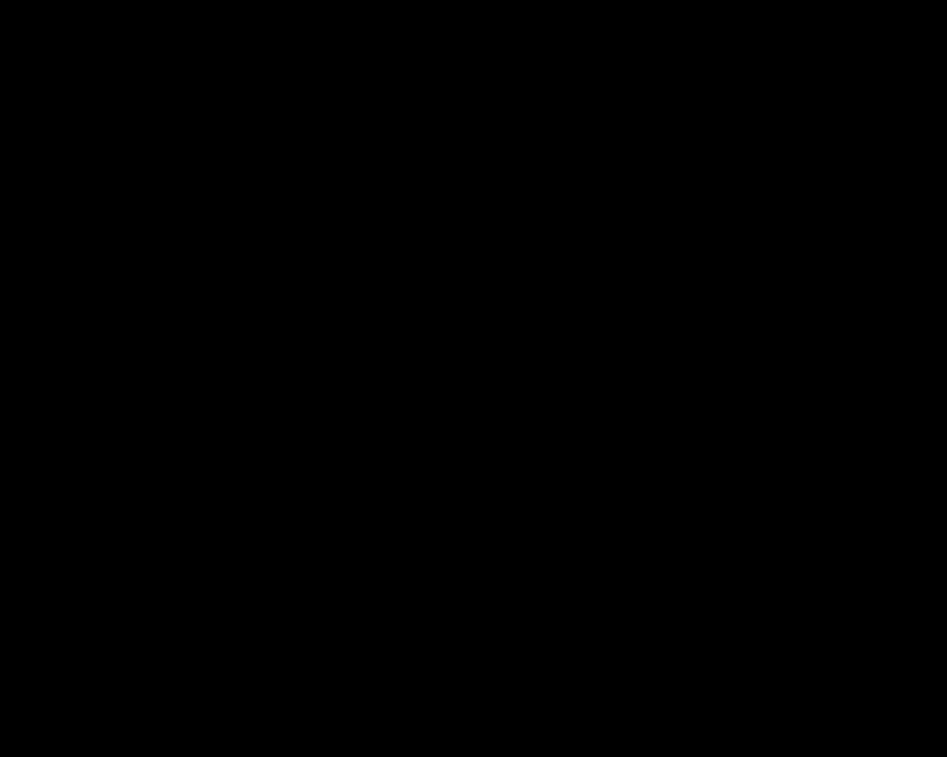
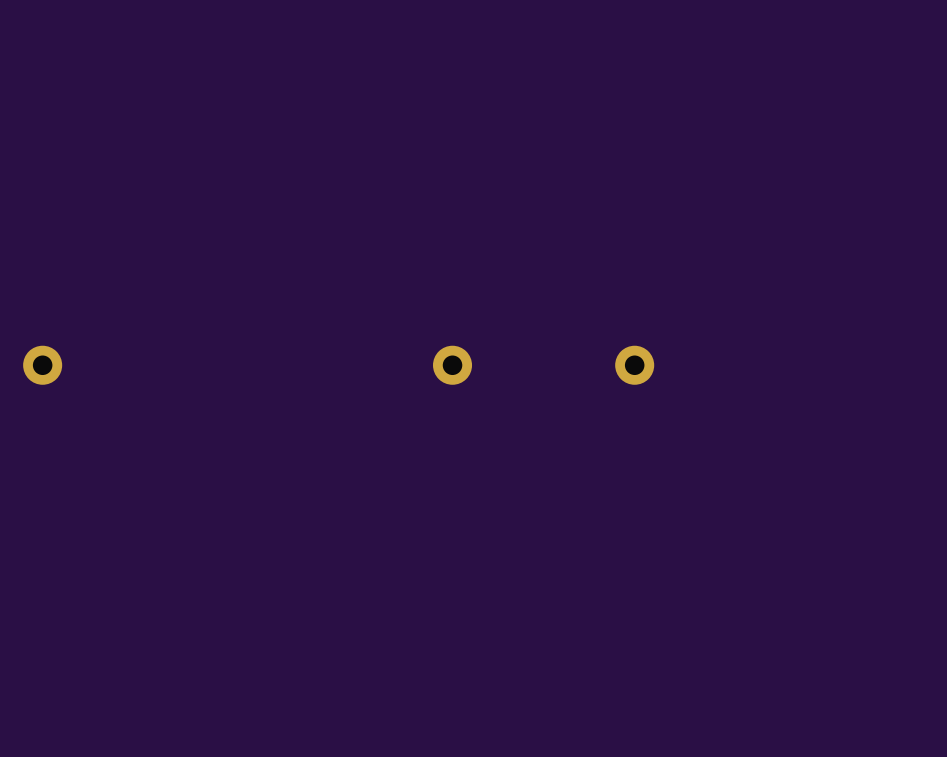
via: none -> (42, 365)
via: none -> (452, 365)
via: none -> (634, 365)

